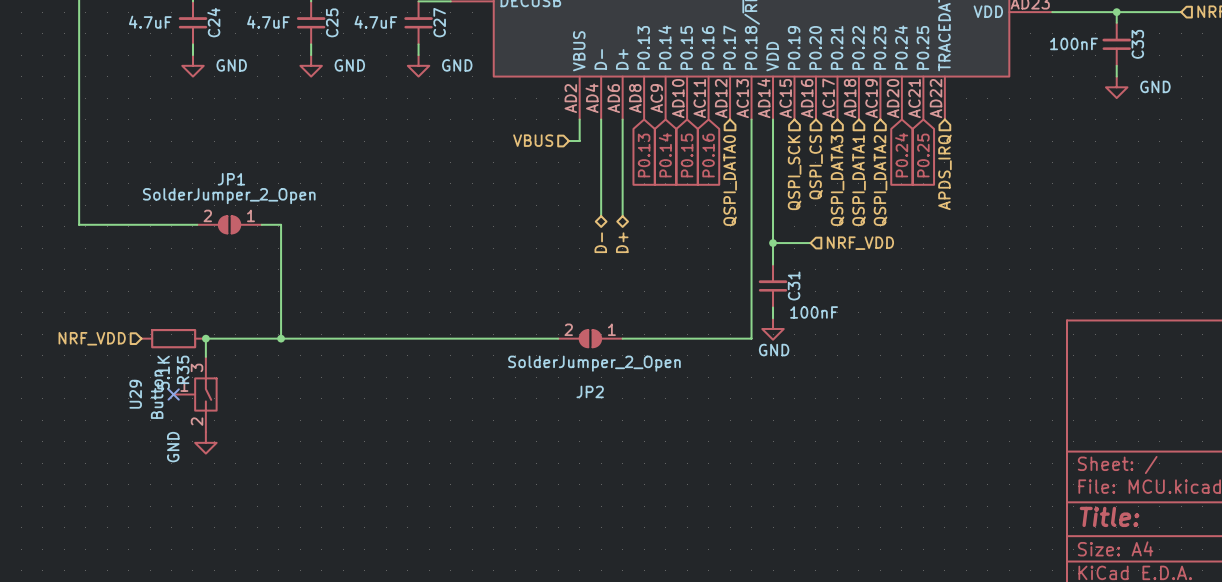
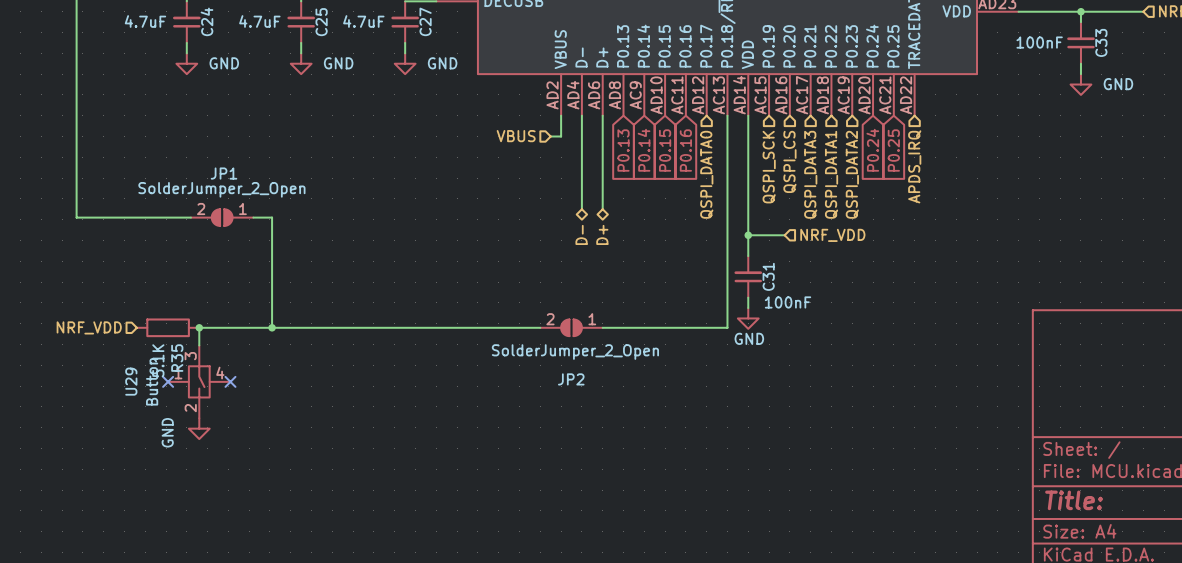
U29 symbol: [173, 356, 217, 433] -> [168, 345, 231, 419]
no-connect mark: none -> (230, 381)

